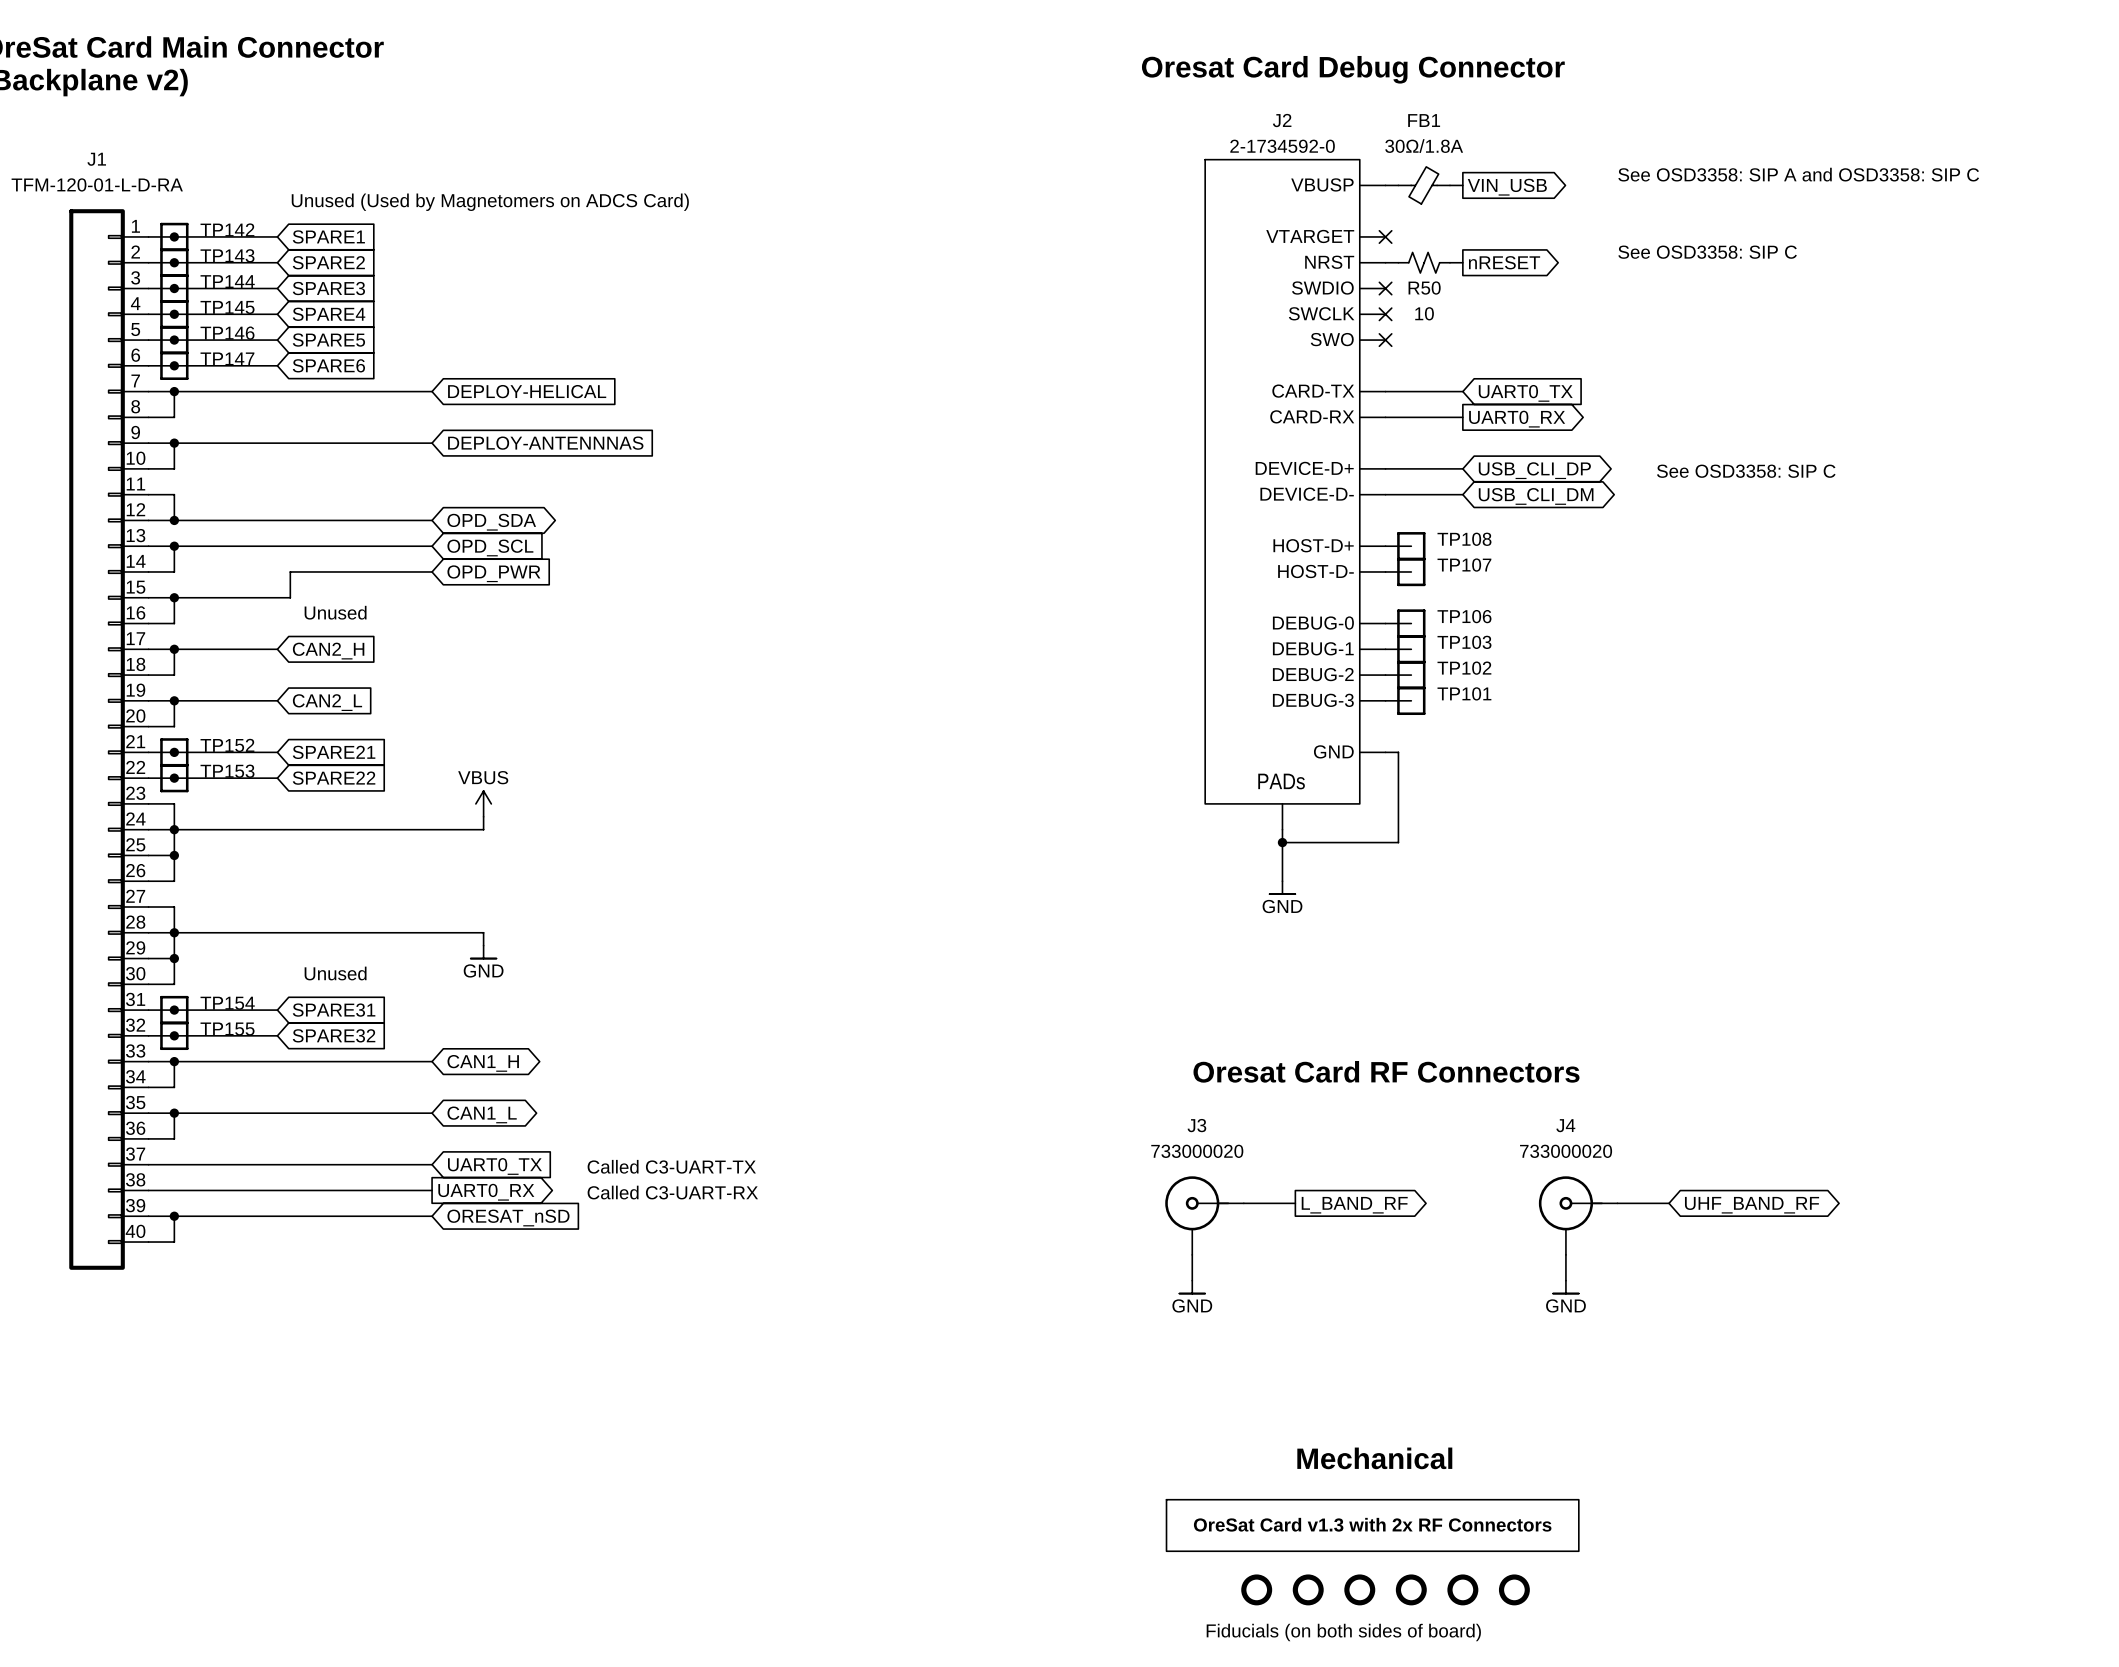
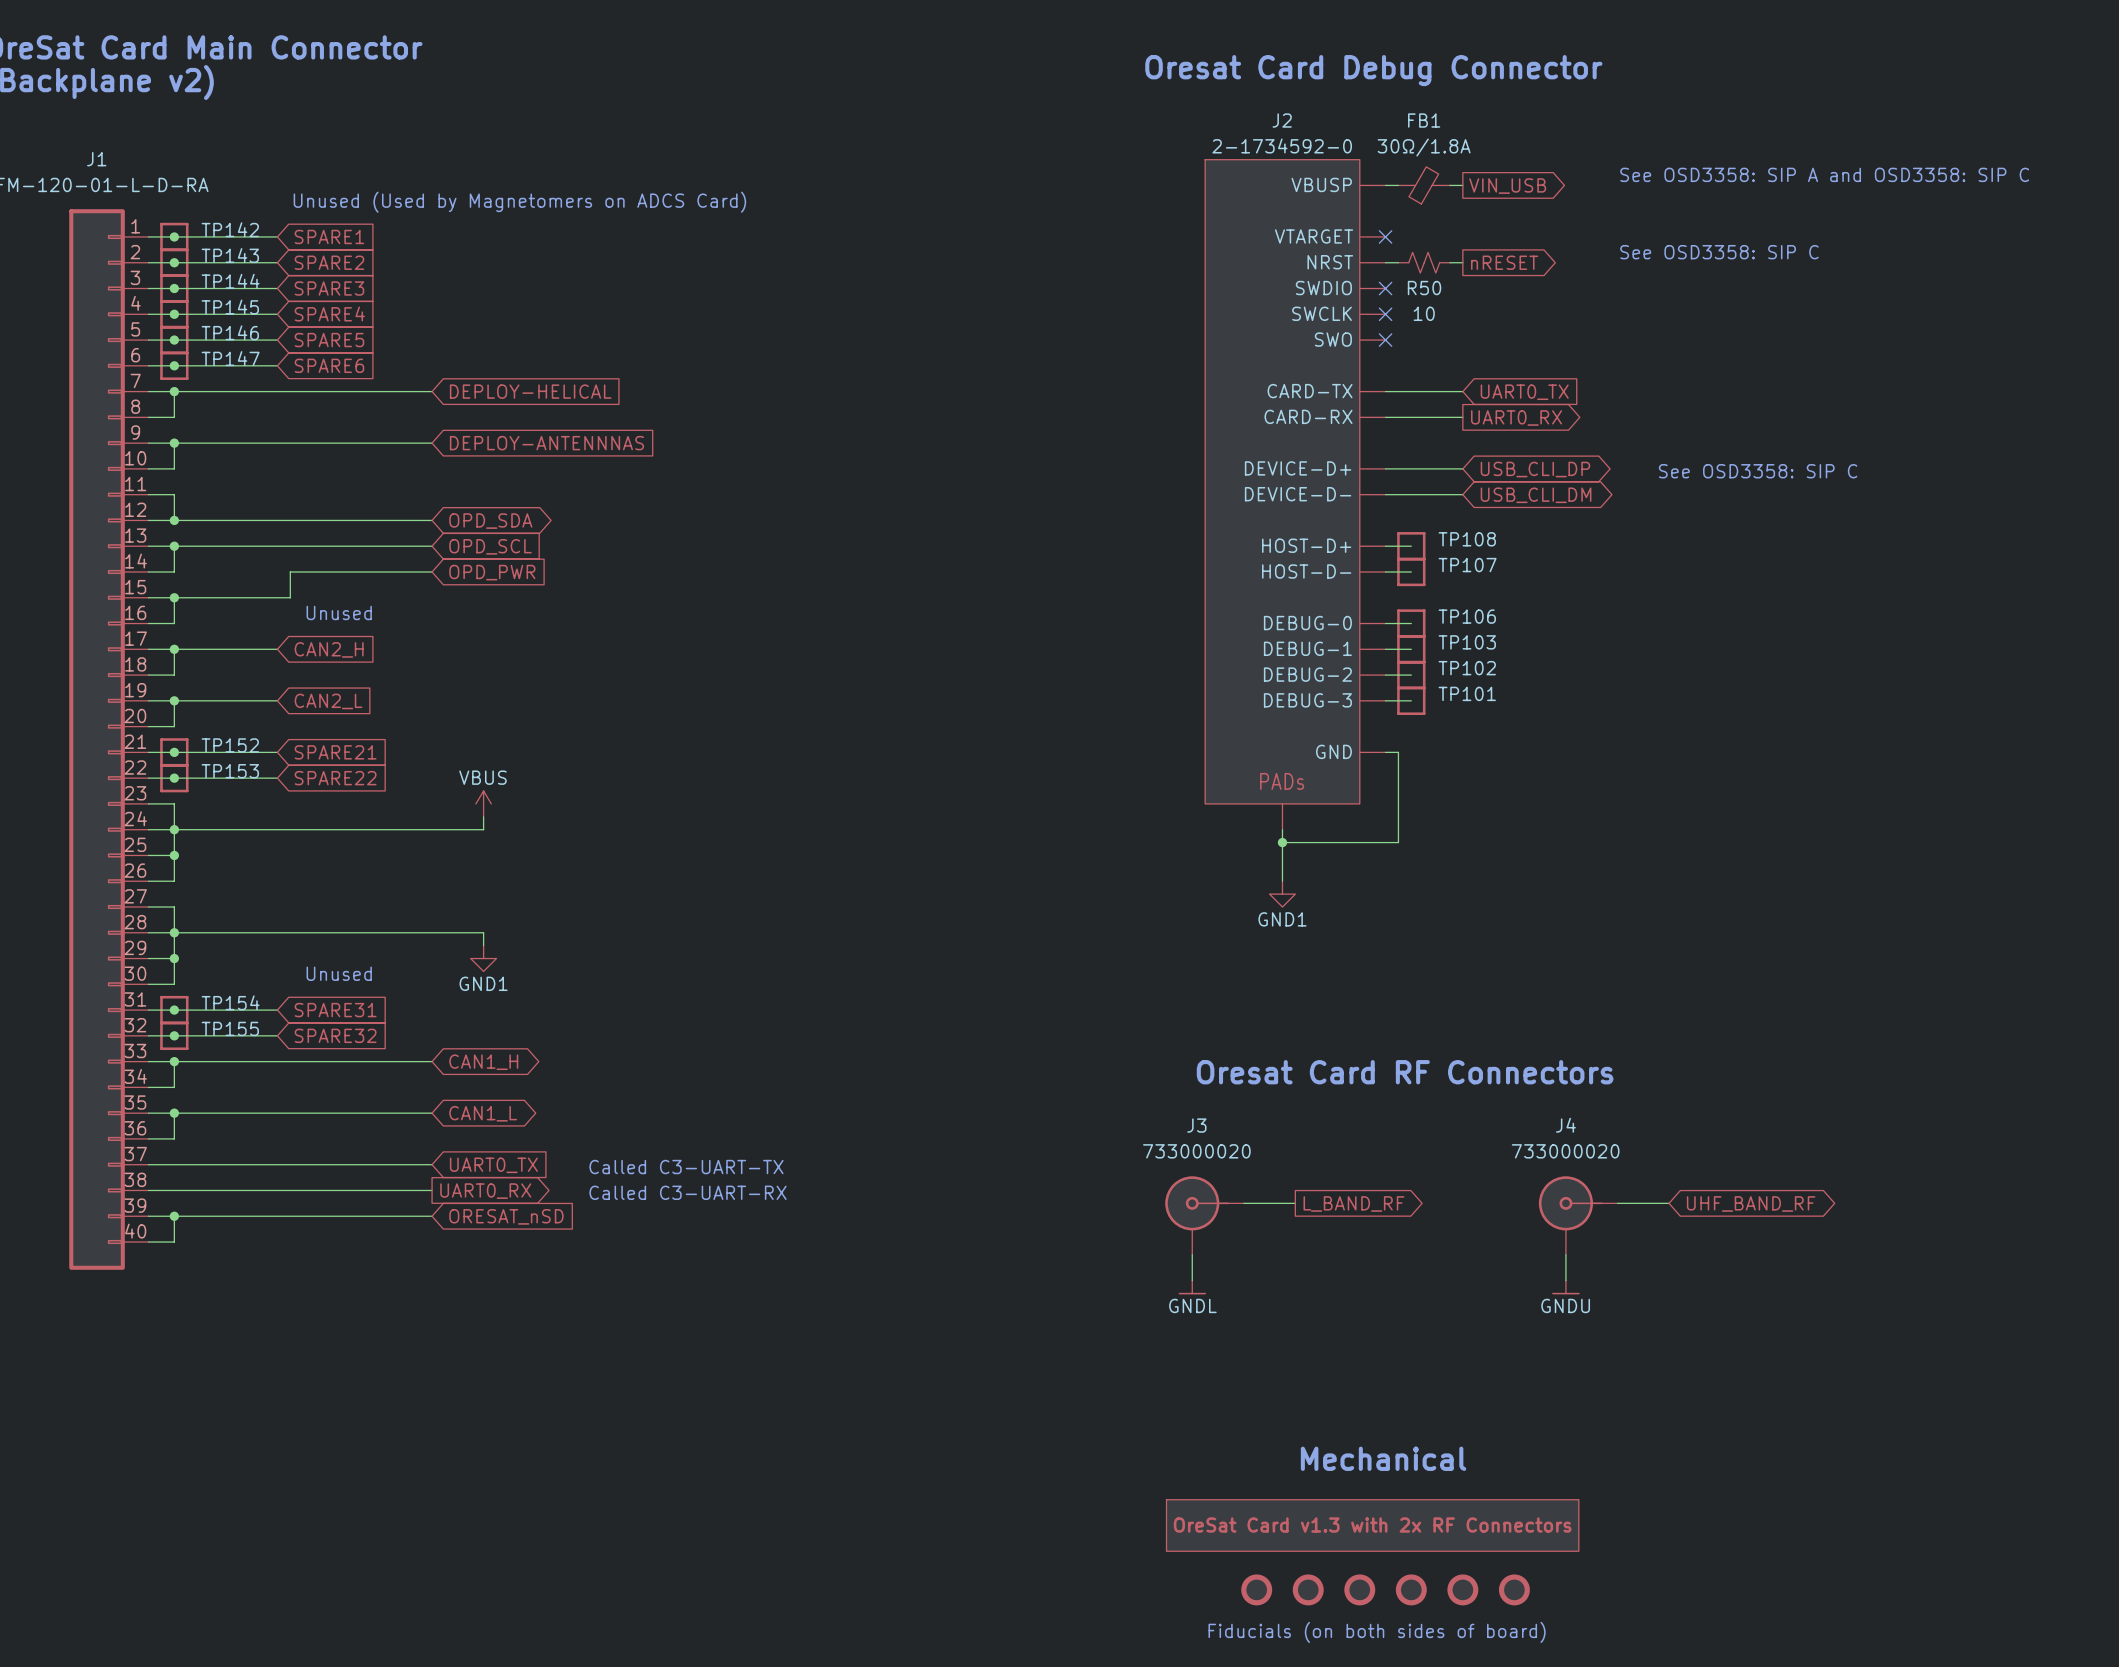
power symbol: GND (1282, 887) -> GND1 (1282, 894)
power symbol: GND (483, 952) -> GND1 (483, 958)
power symbol: GND (1192, 1287) -> GNDL (1192, 1287)
power symbol: GND (1565, 1287) -> GNDU (1565, 1287)

